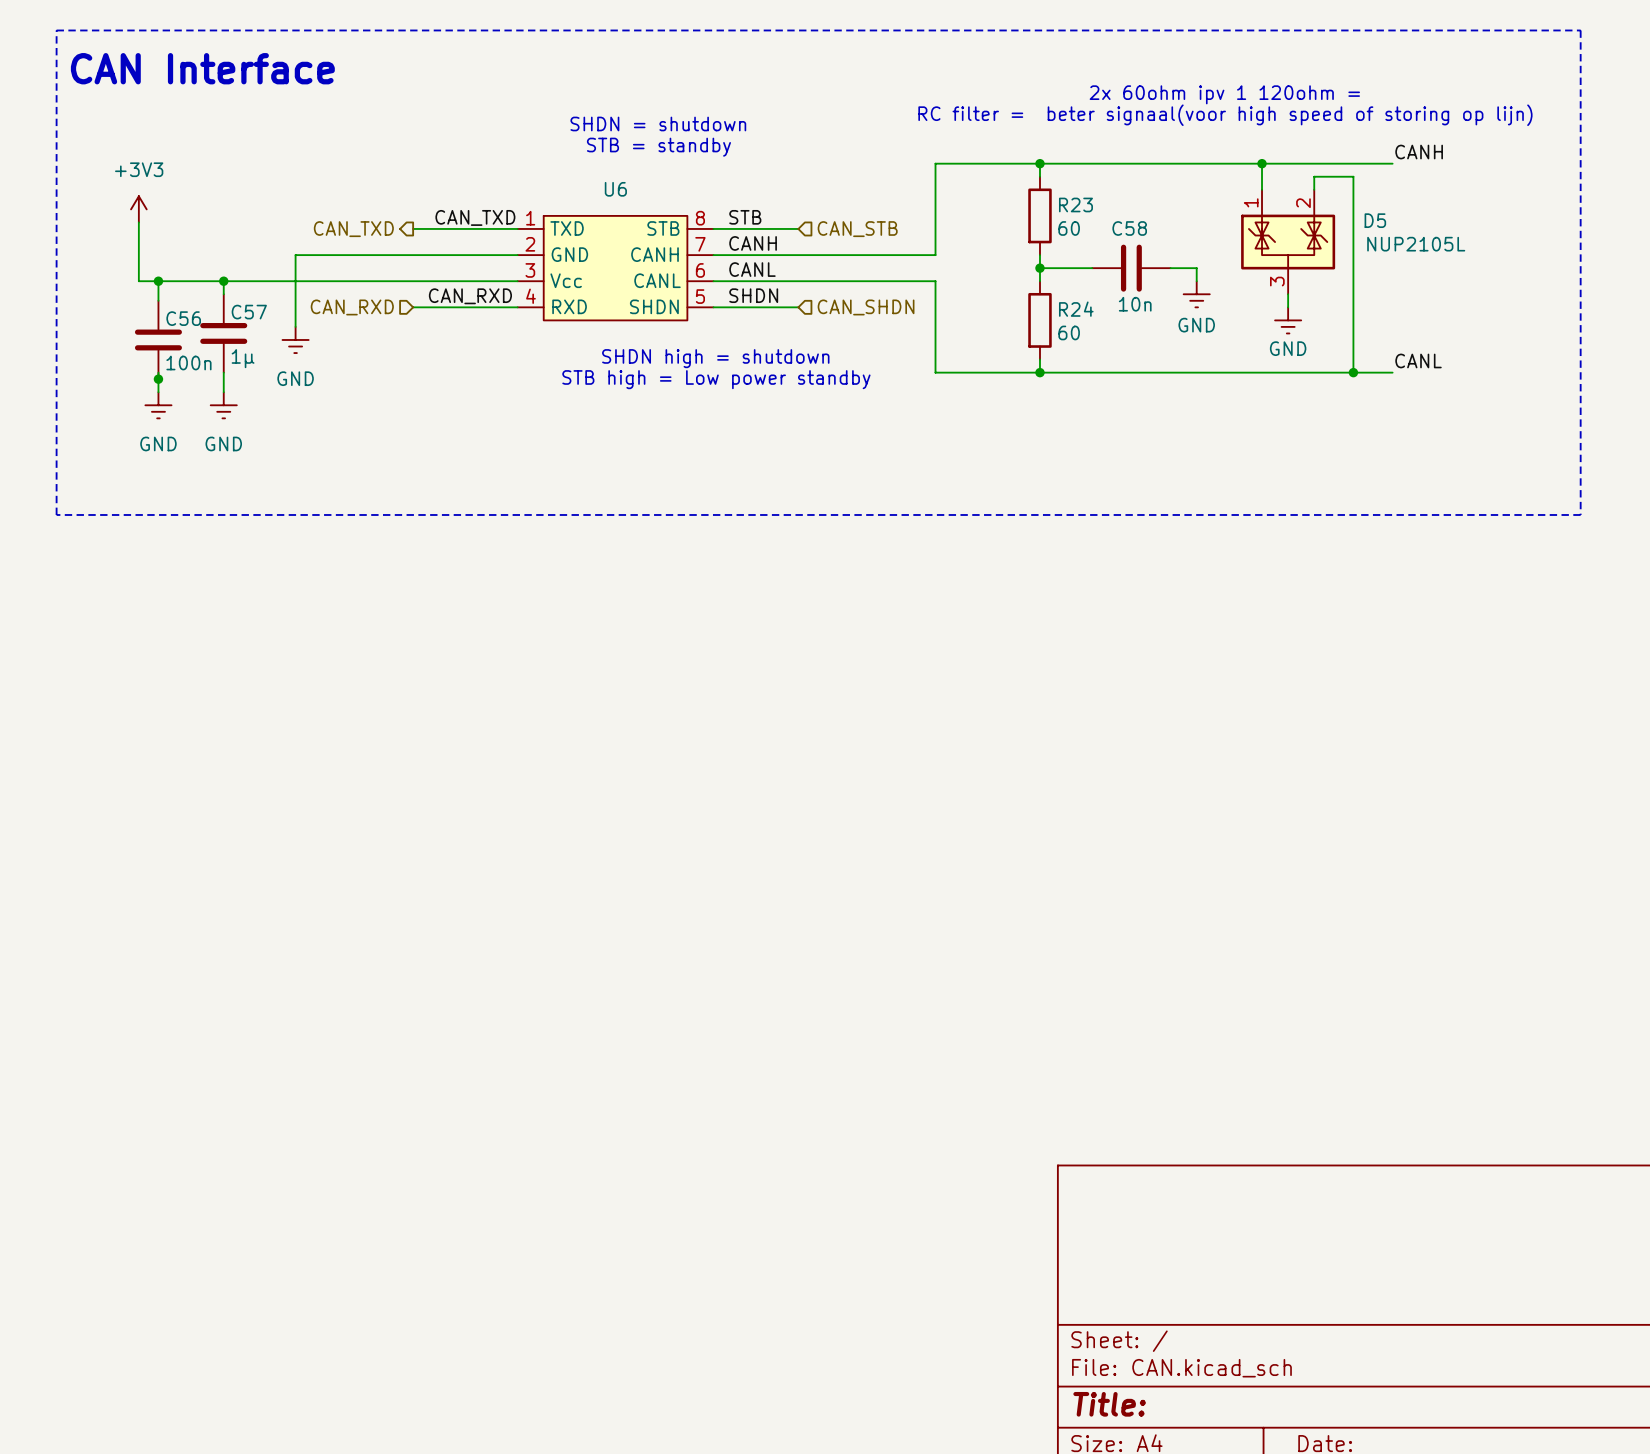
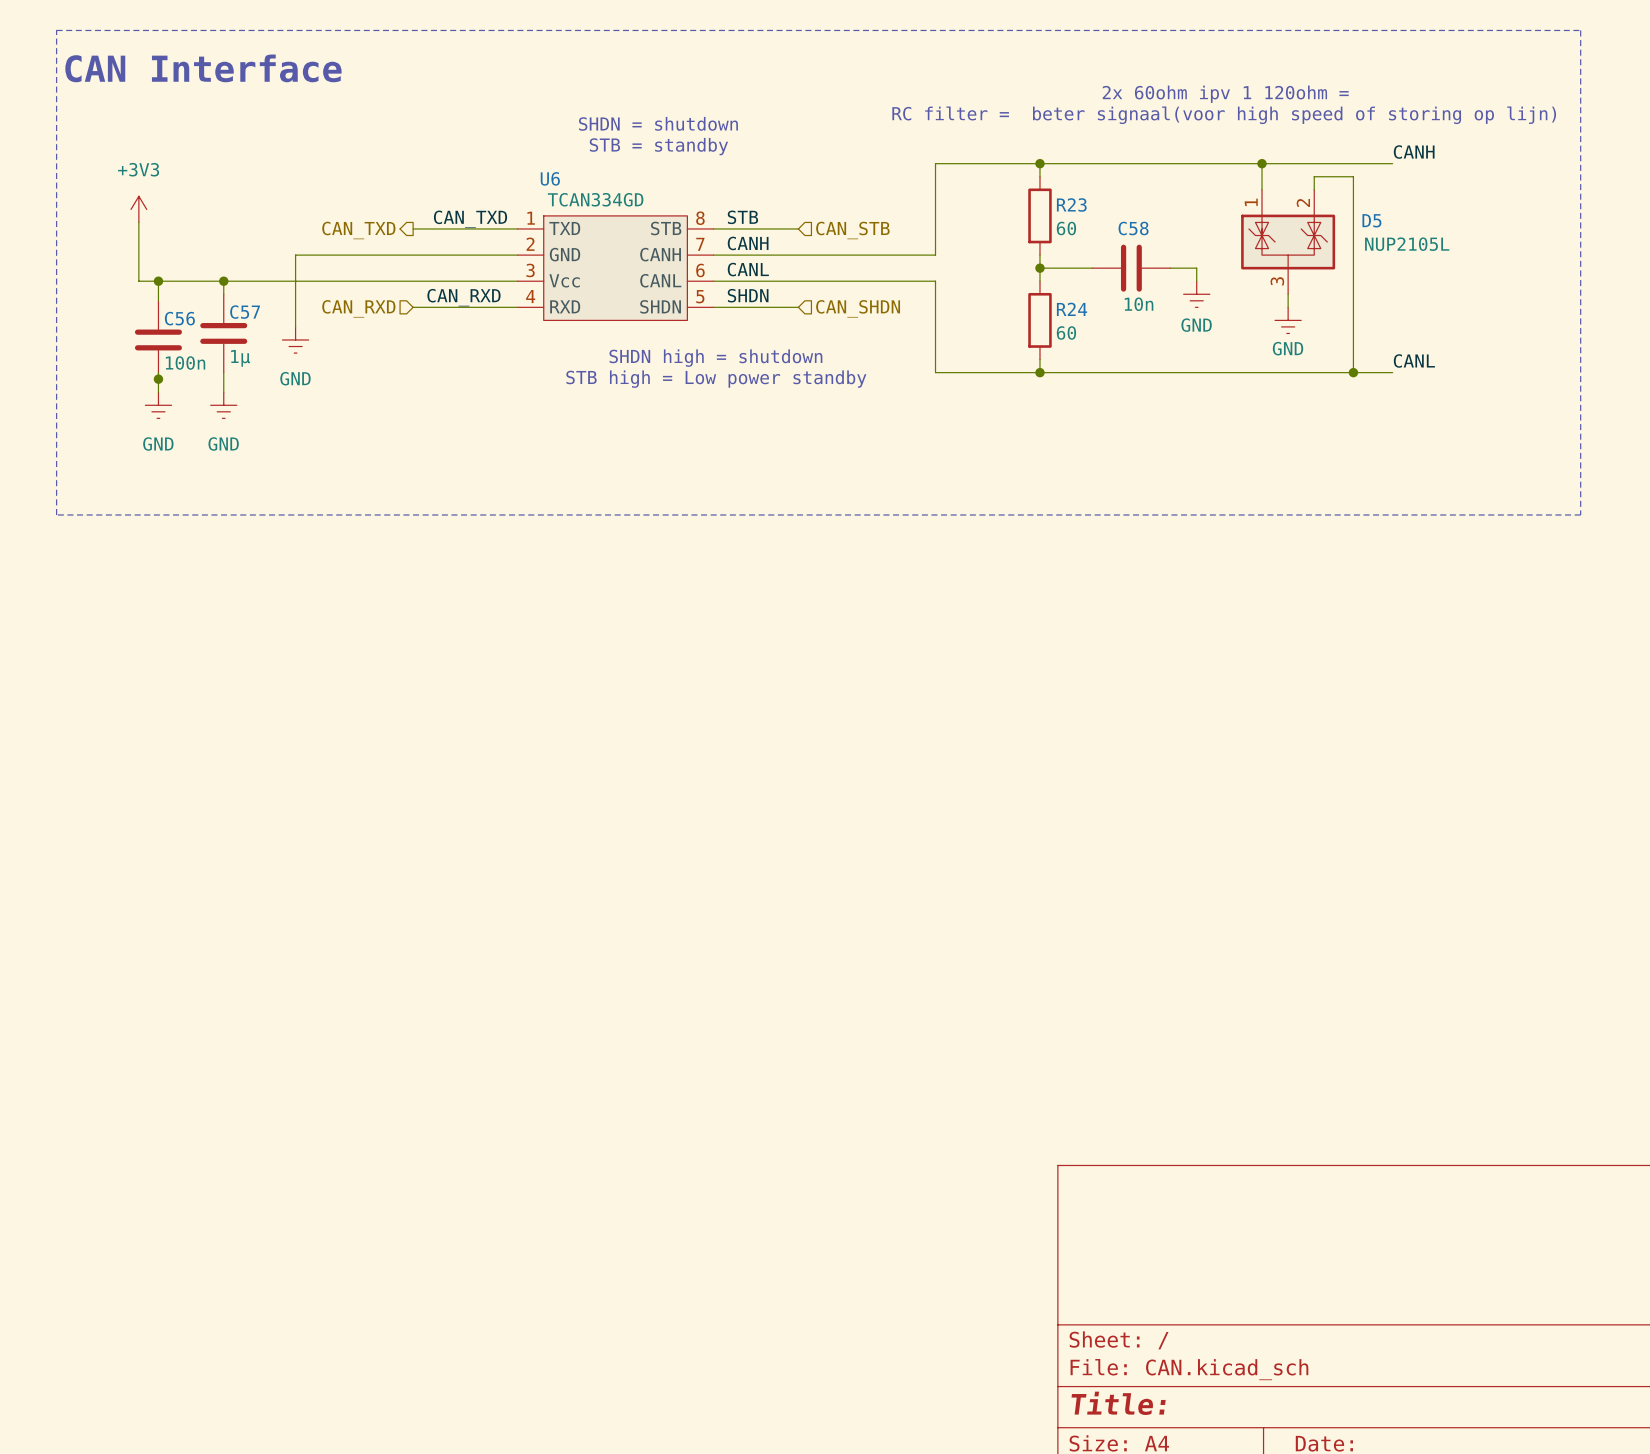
U6 name position: U6 (615, 189) -> U6 (550, 178)
U6 value: none -> TCAN334GD (595, 199)

